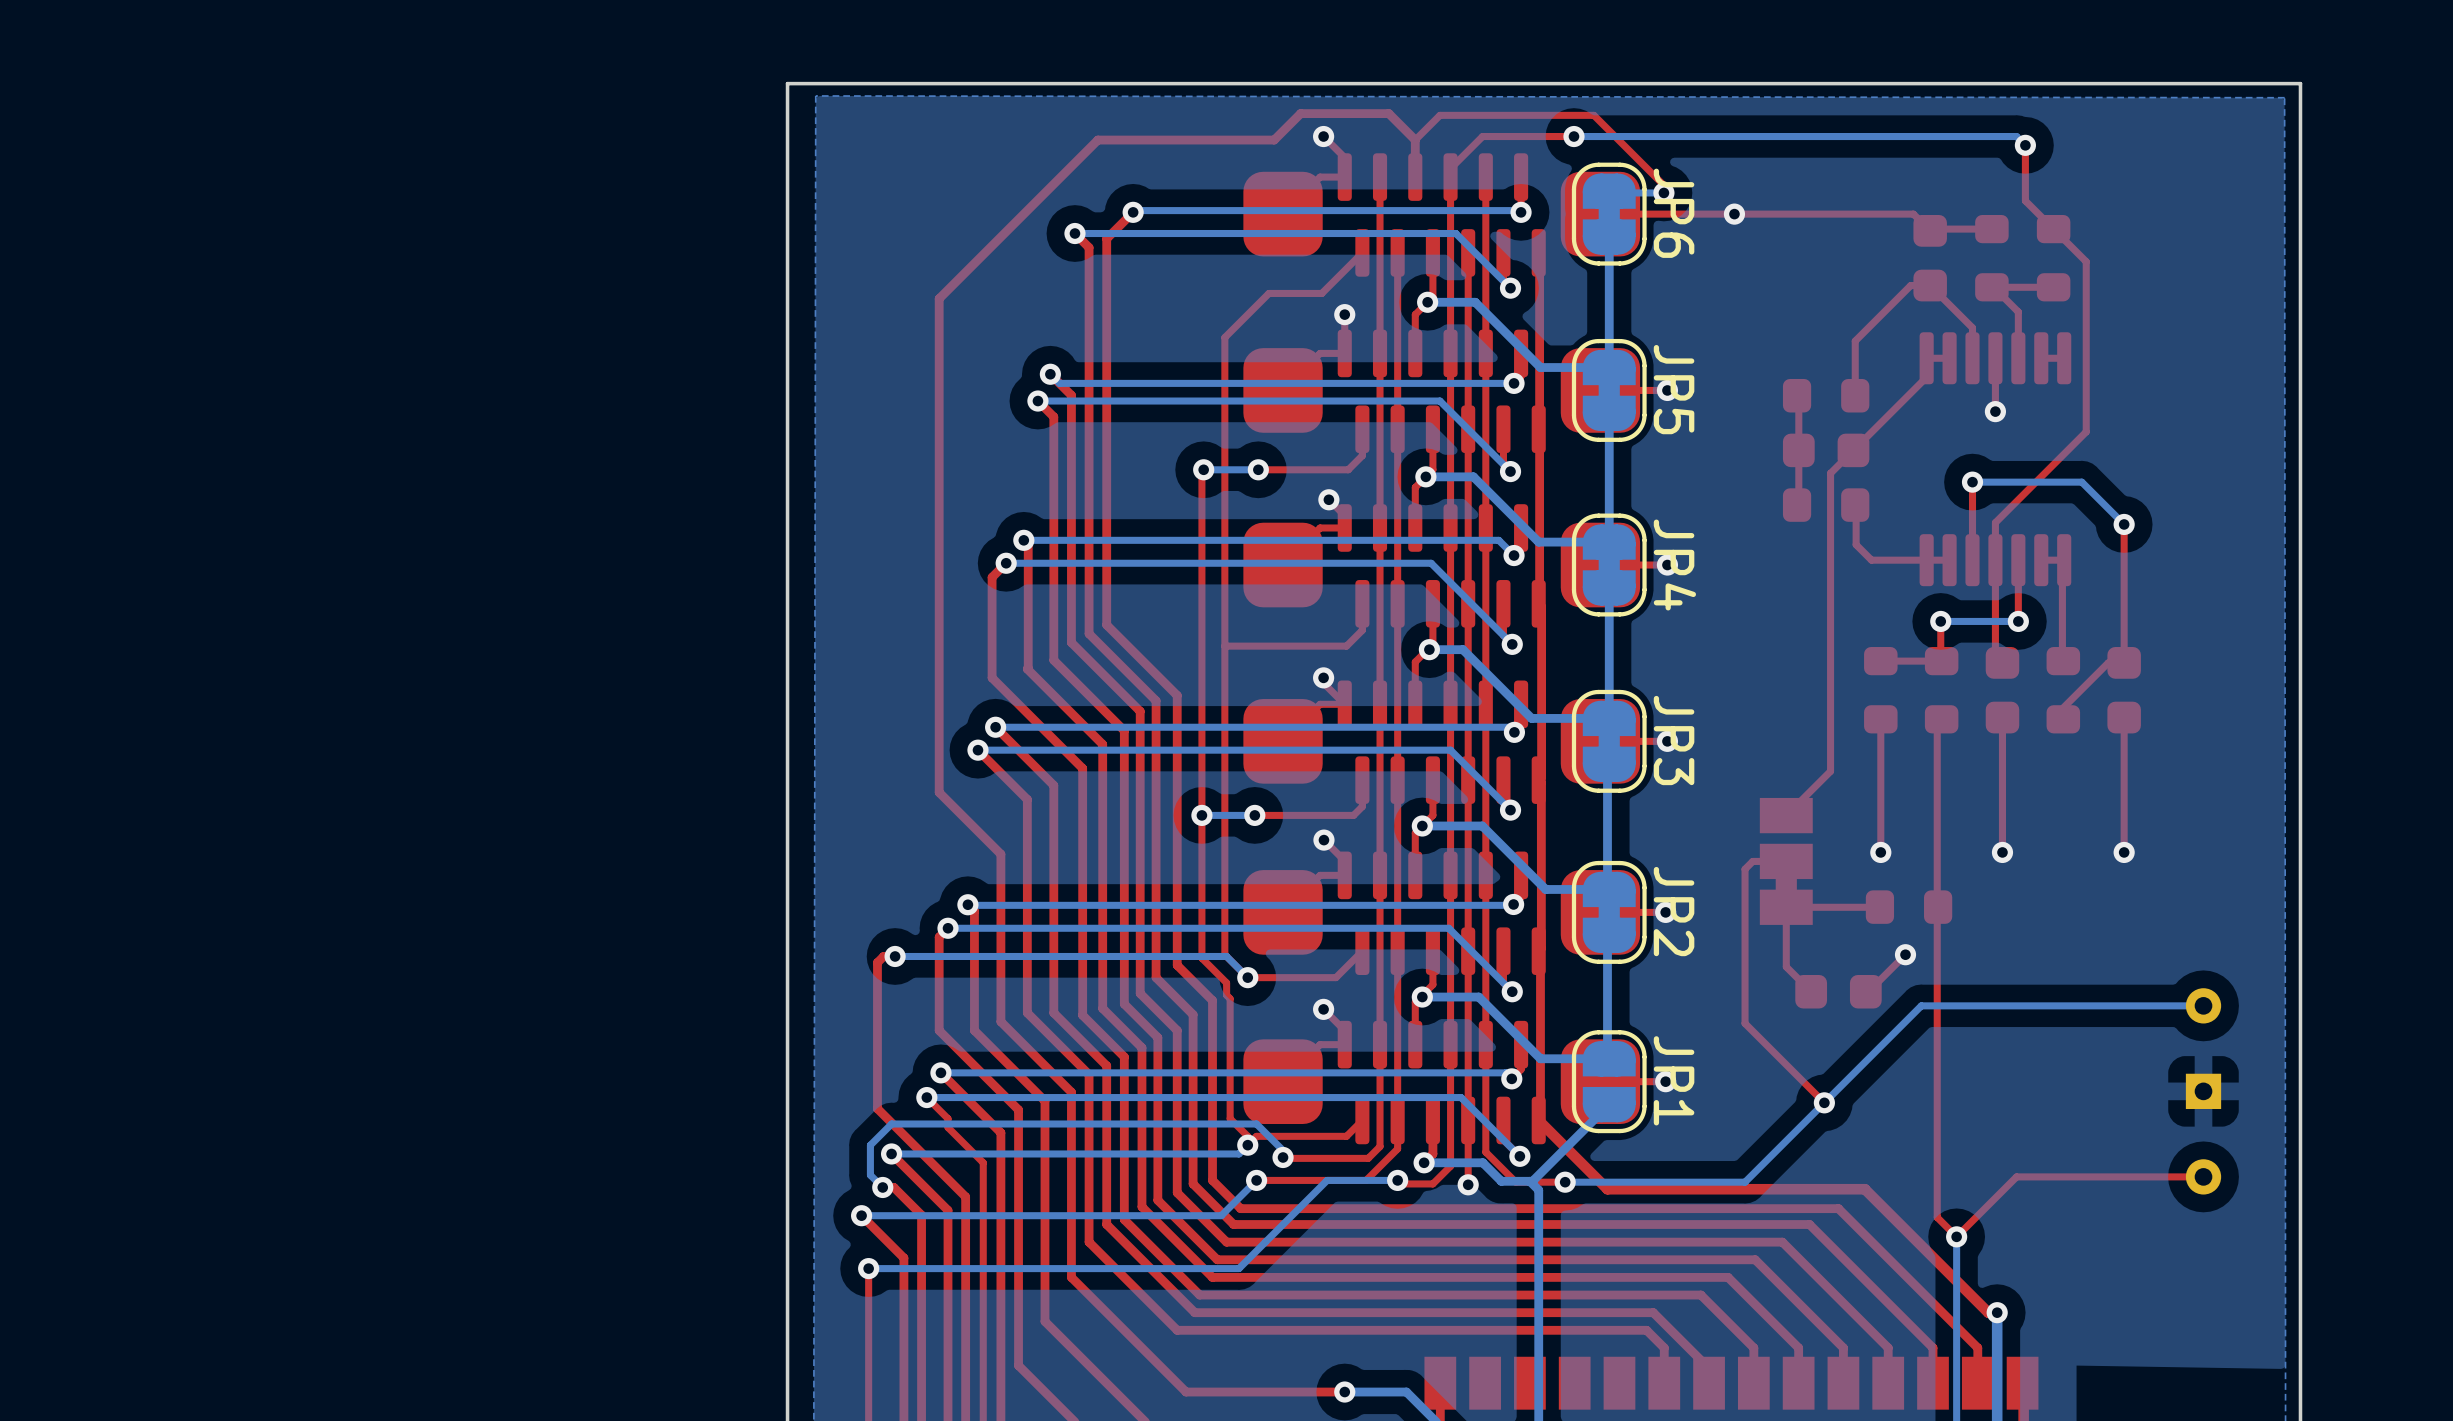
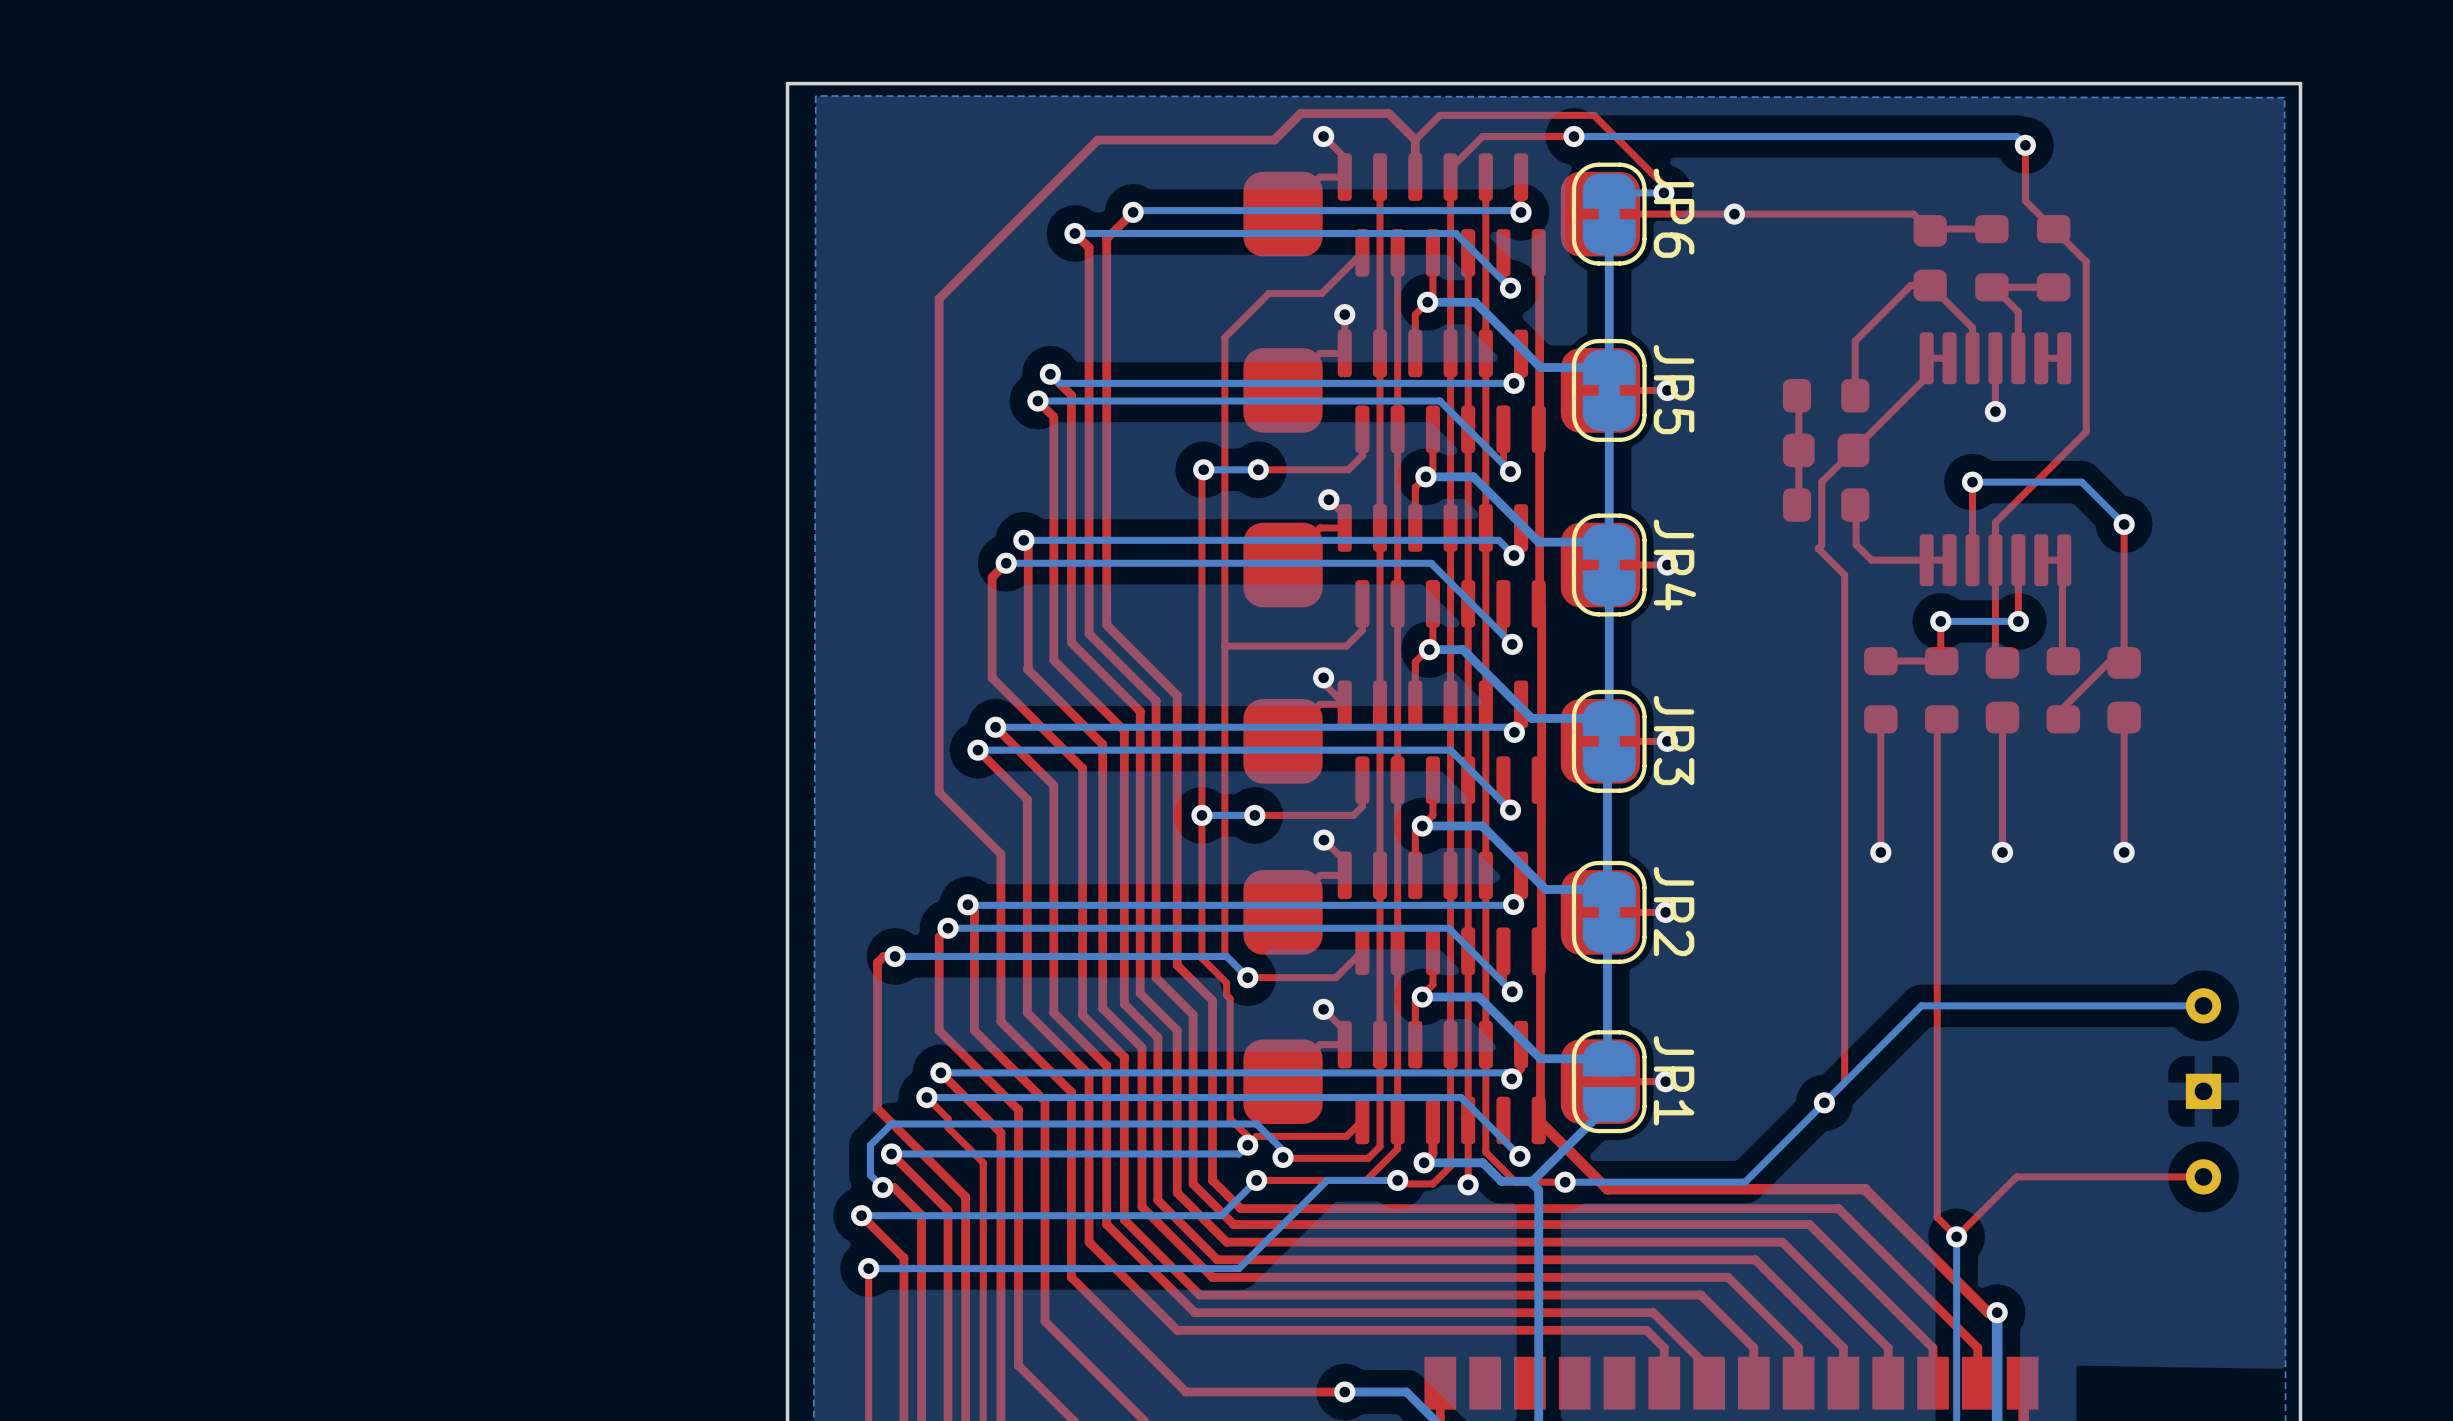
top track: (1830, 473) (1830, 771) (1786, 815) -> (1830, 473) (1821, 482) (1821, 544) (1818, 548) (1844, 574) (1844, 1082) (1824, 1102)
top track: (1786, 861) (1752, 861) (1745, 869) (1745, 1023) (1824, 1102) -> none
part: (1786, 861) -> none
top track: (1879, 907) (1786, 907) (1786, 966) (1811, 991) -> none
part: (1909, 907) -> none
top track: (1905, 954) (1868, 991) (1865, 991) -> none
via: (1905, 954) -> none
part: (1838, 991) -> none

